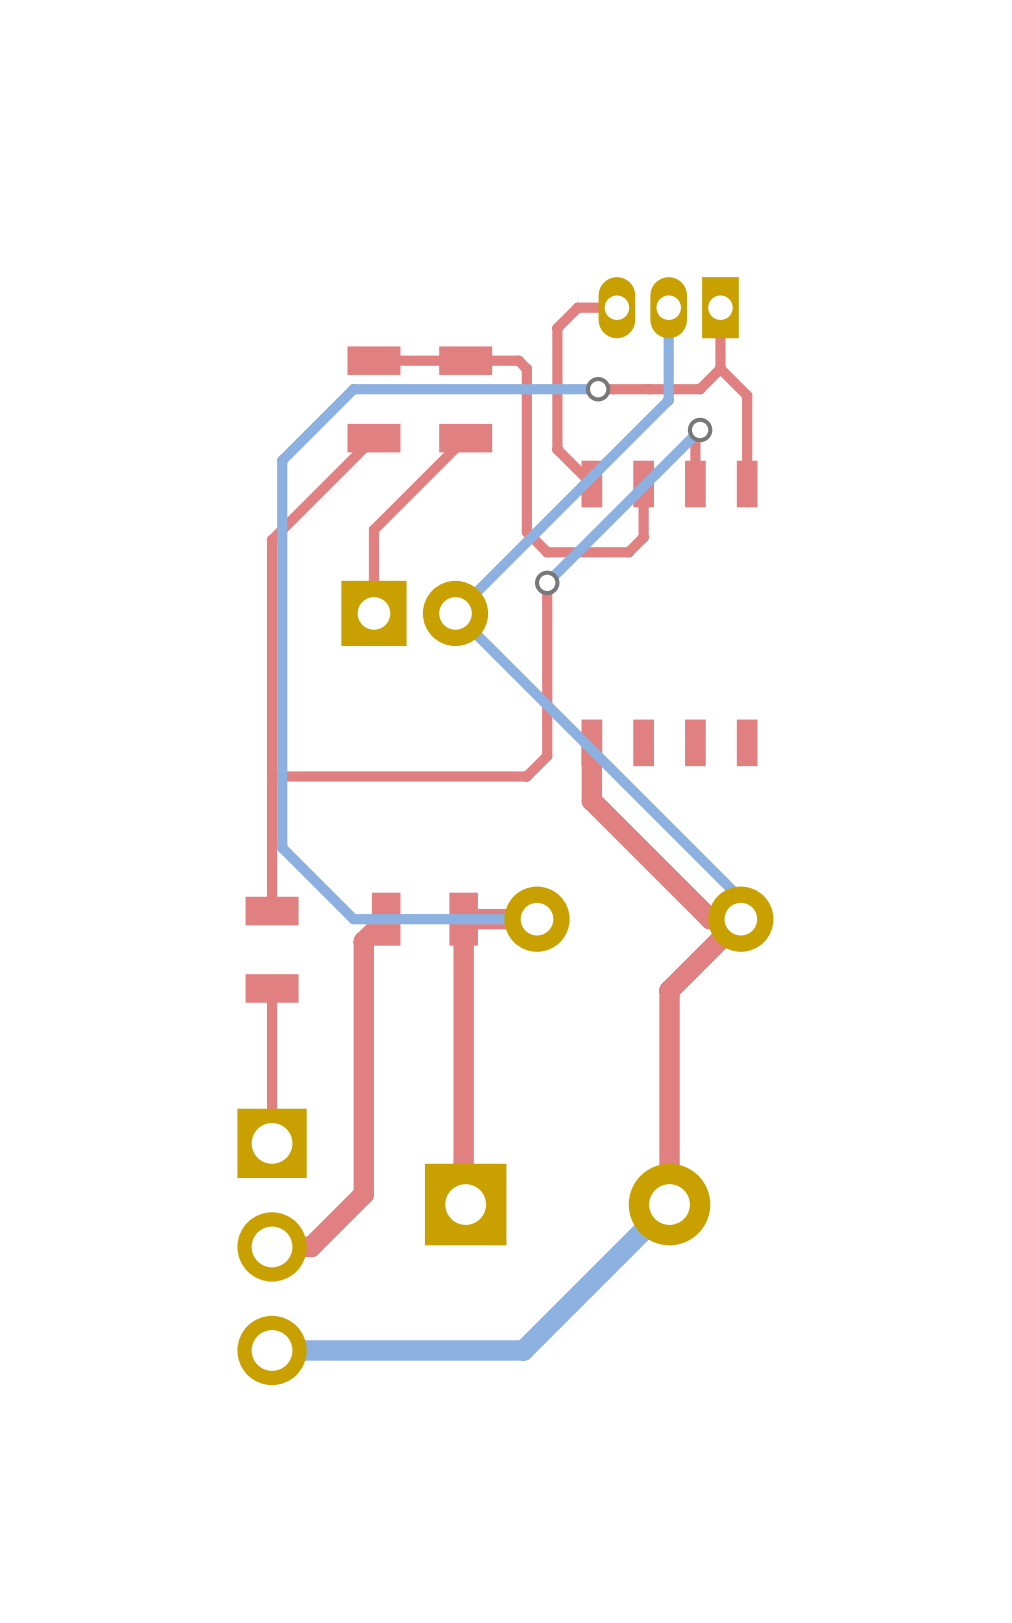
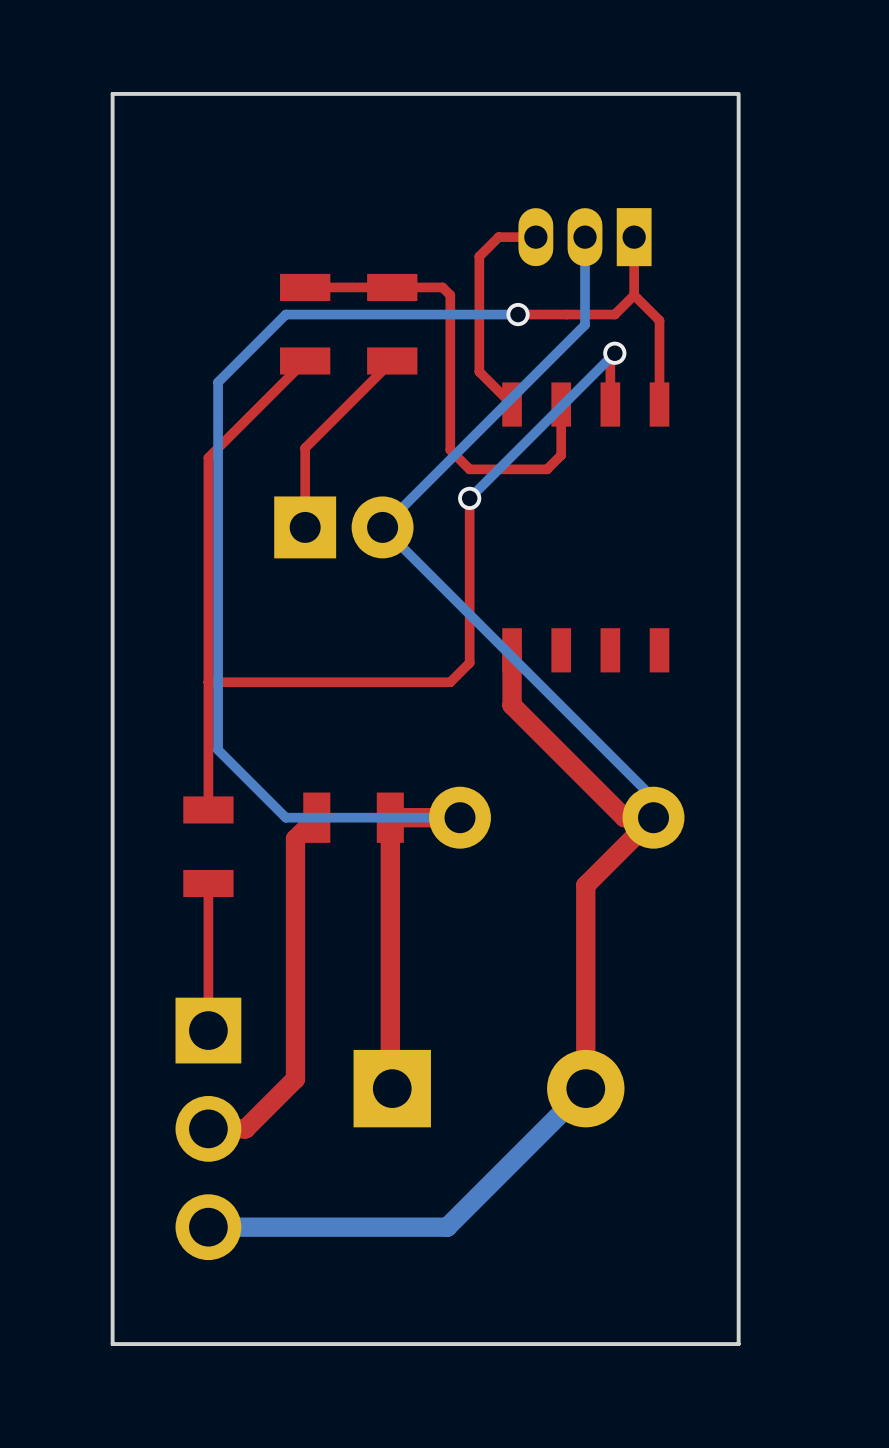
board edge: none -> (738, 93) (738, 1344) (112, 1344) (112, 93) (737, 93)

